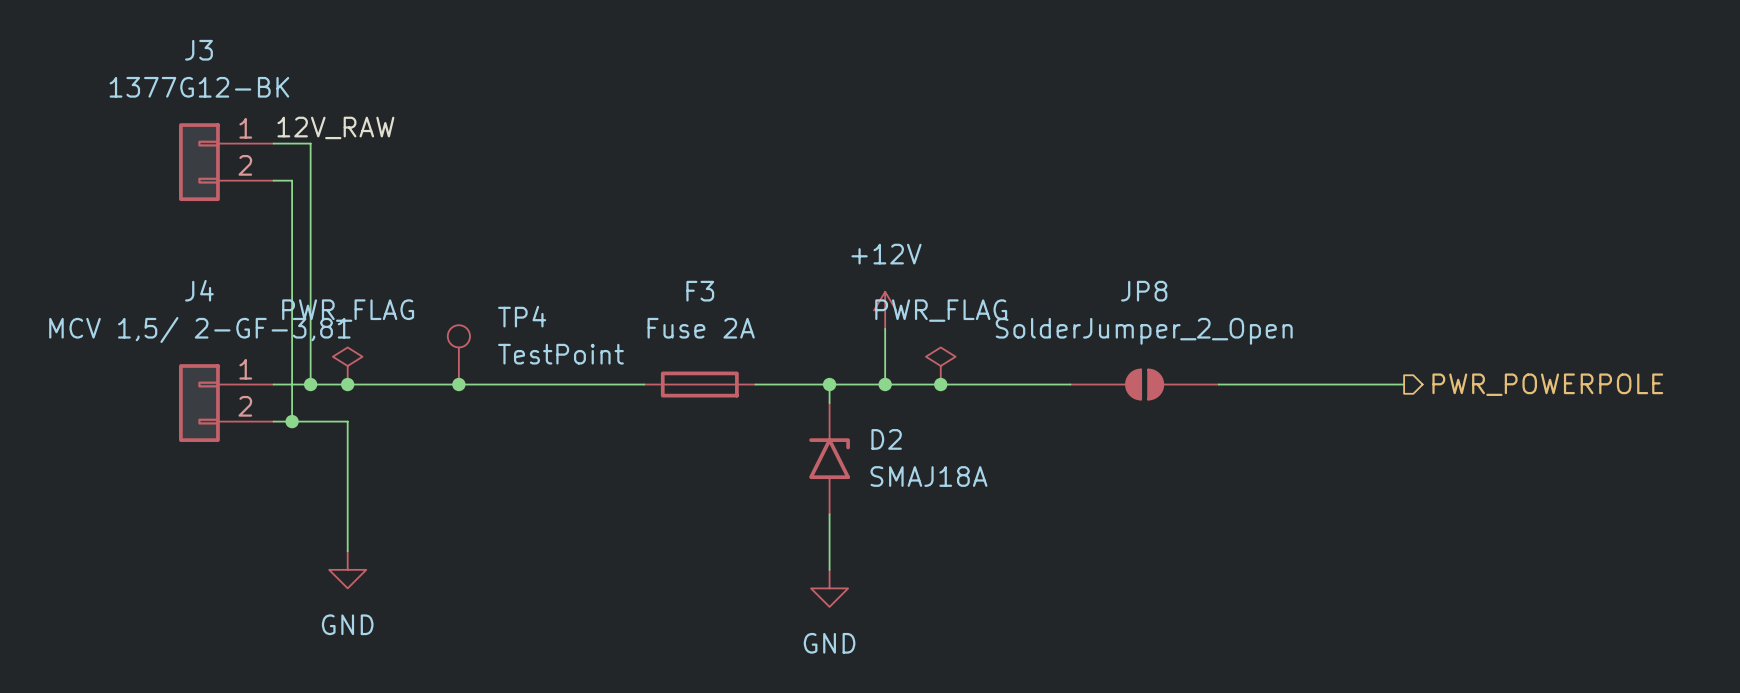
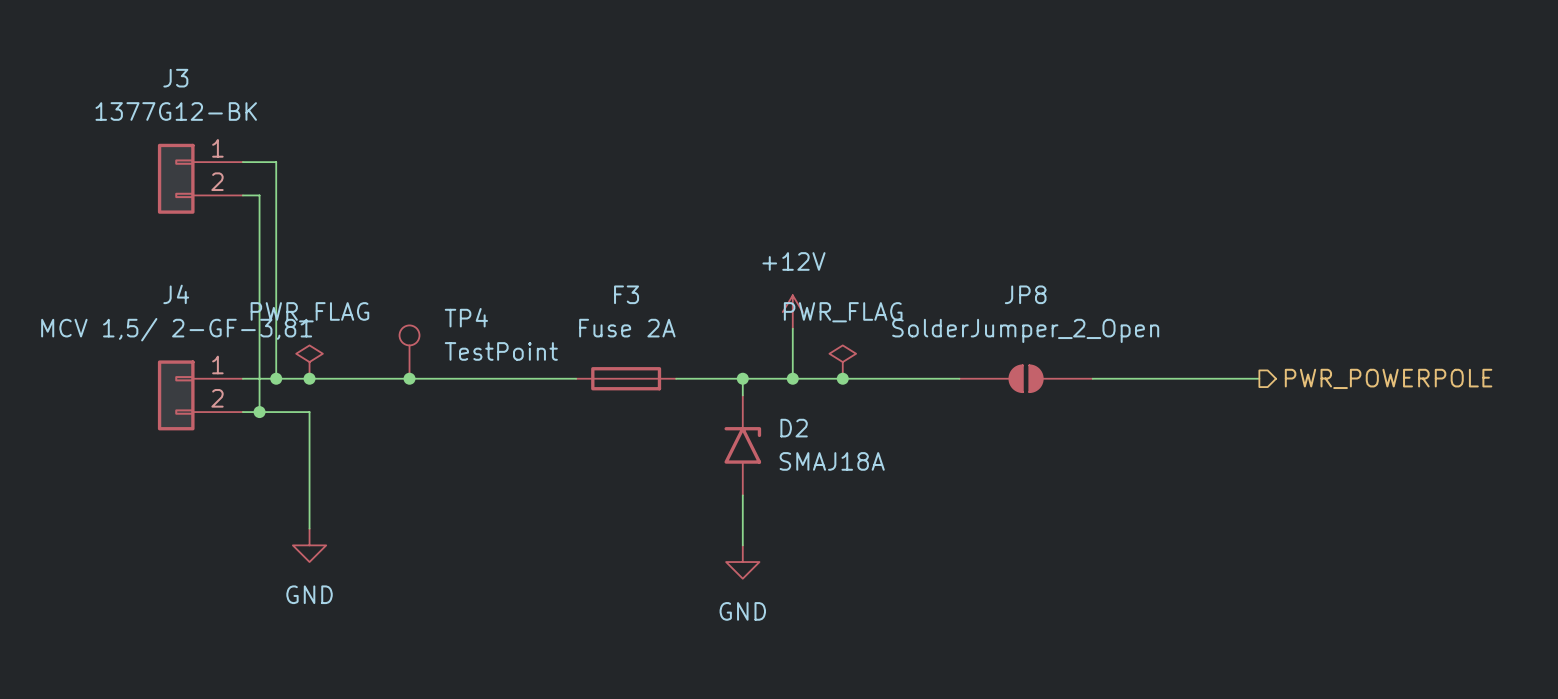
label: 12V_RAW (335, 127) -> none

